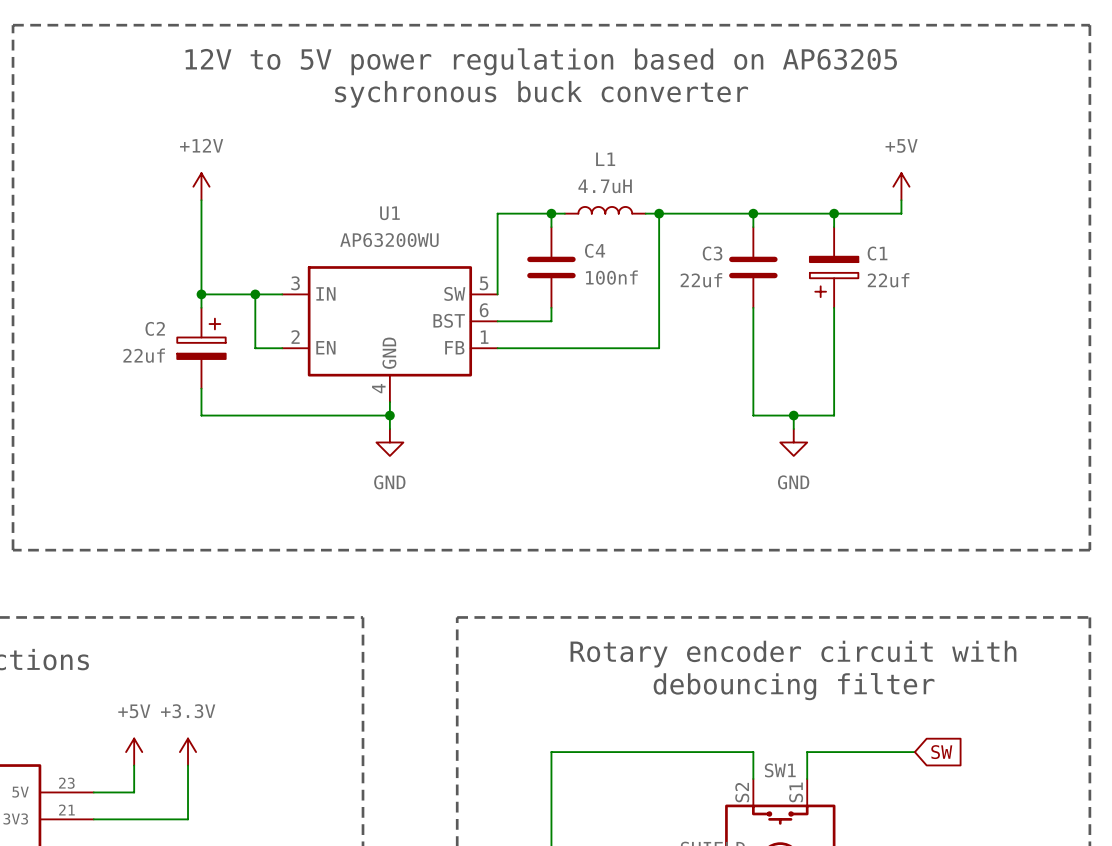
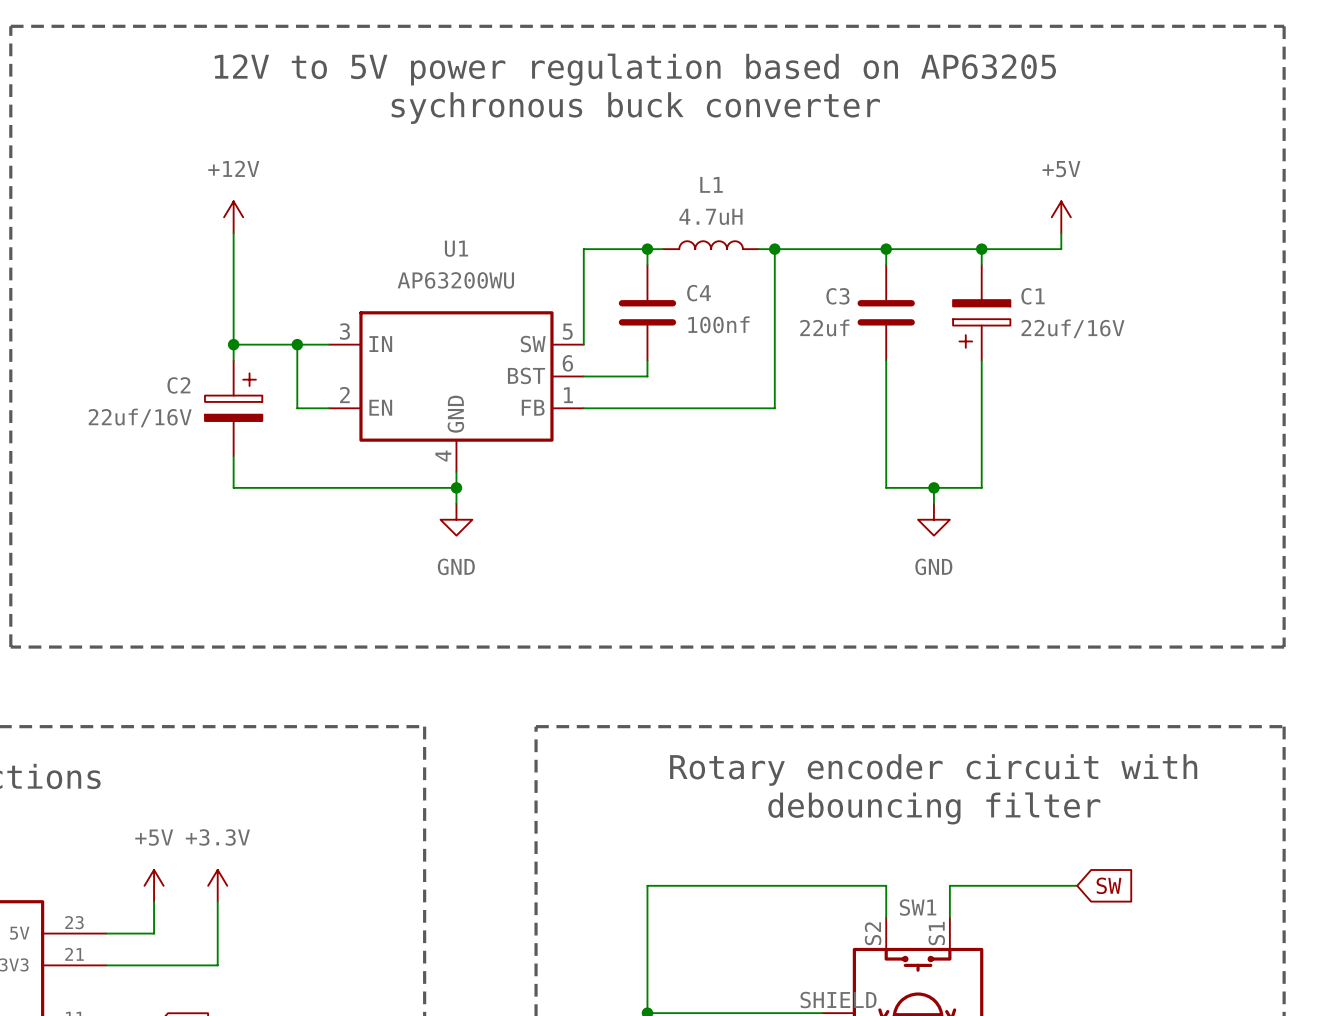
C1 value: 22uf (888, 280) -> 22uf/16V (1072, 328)
C2 value: 22uf (144, 355) -> 22uf/16V (140, 417)

